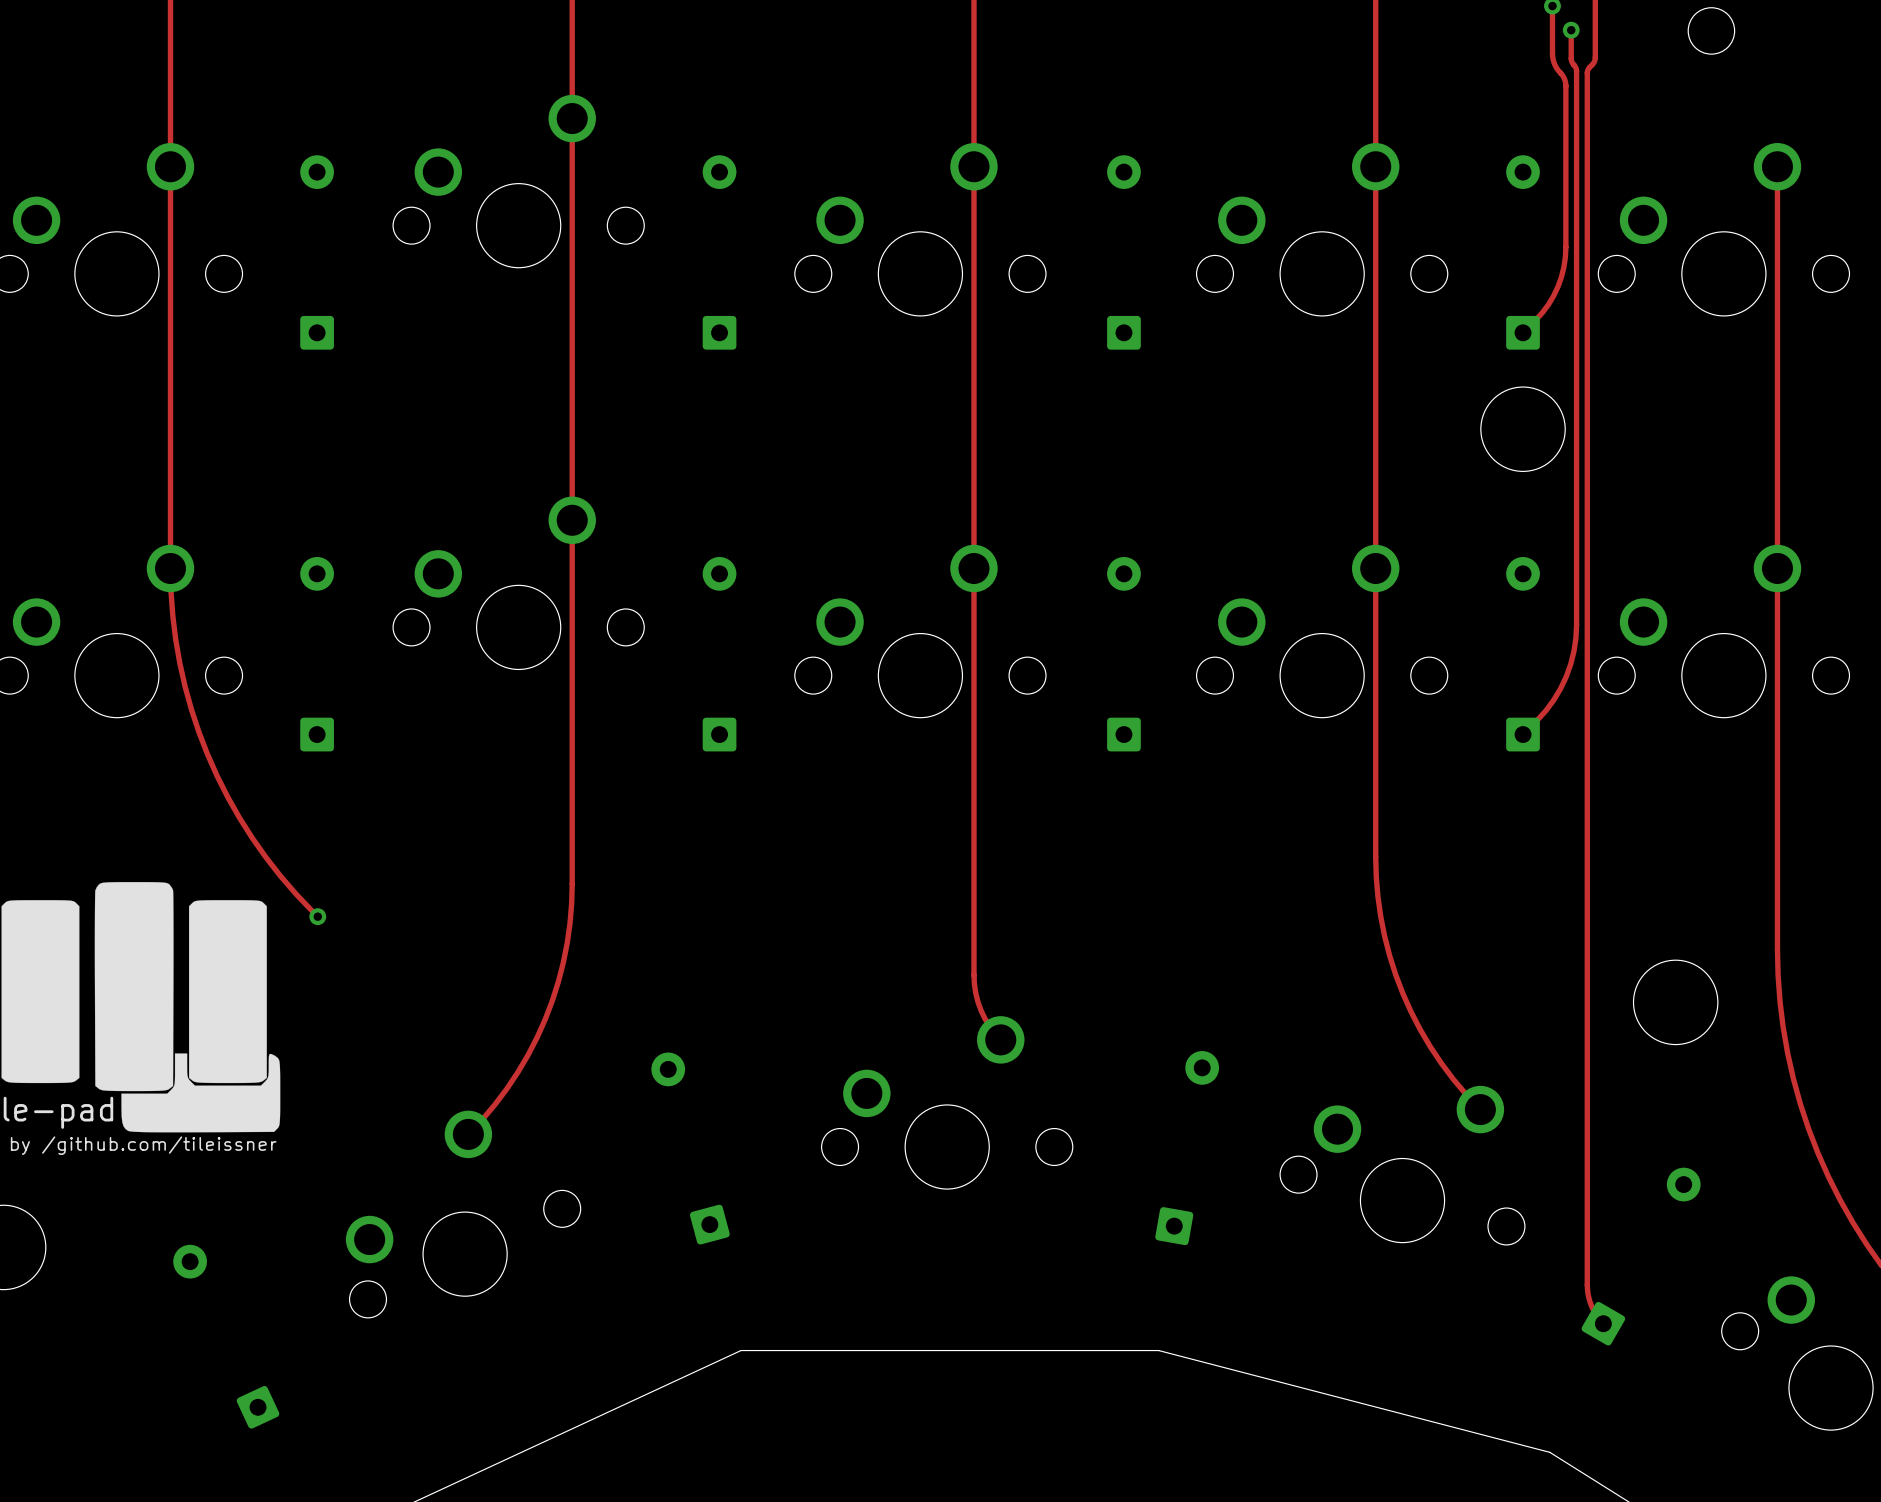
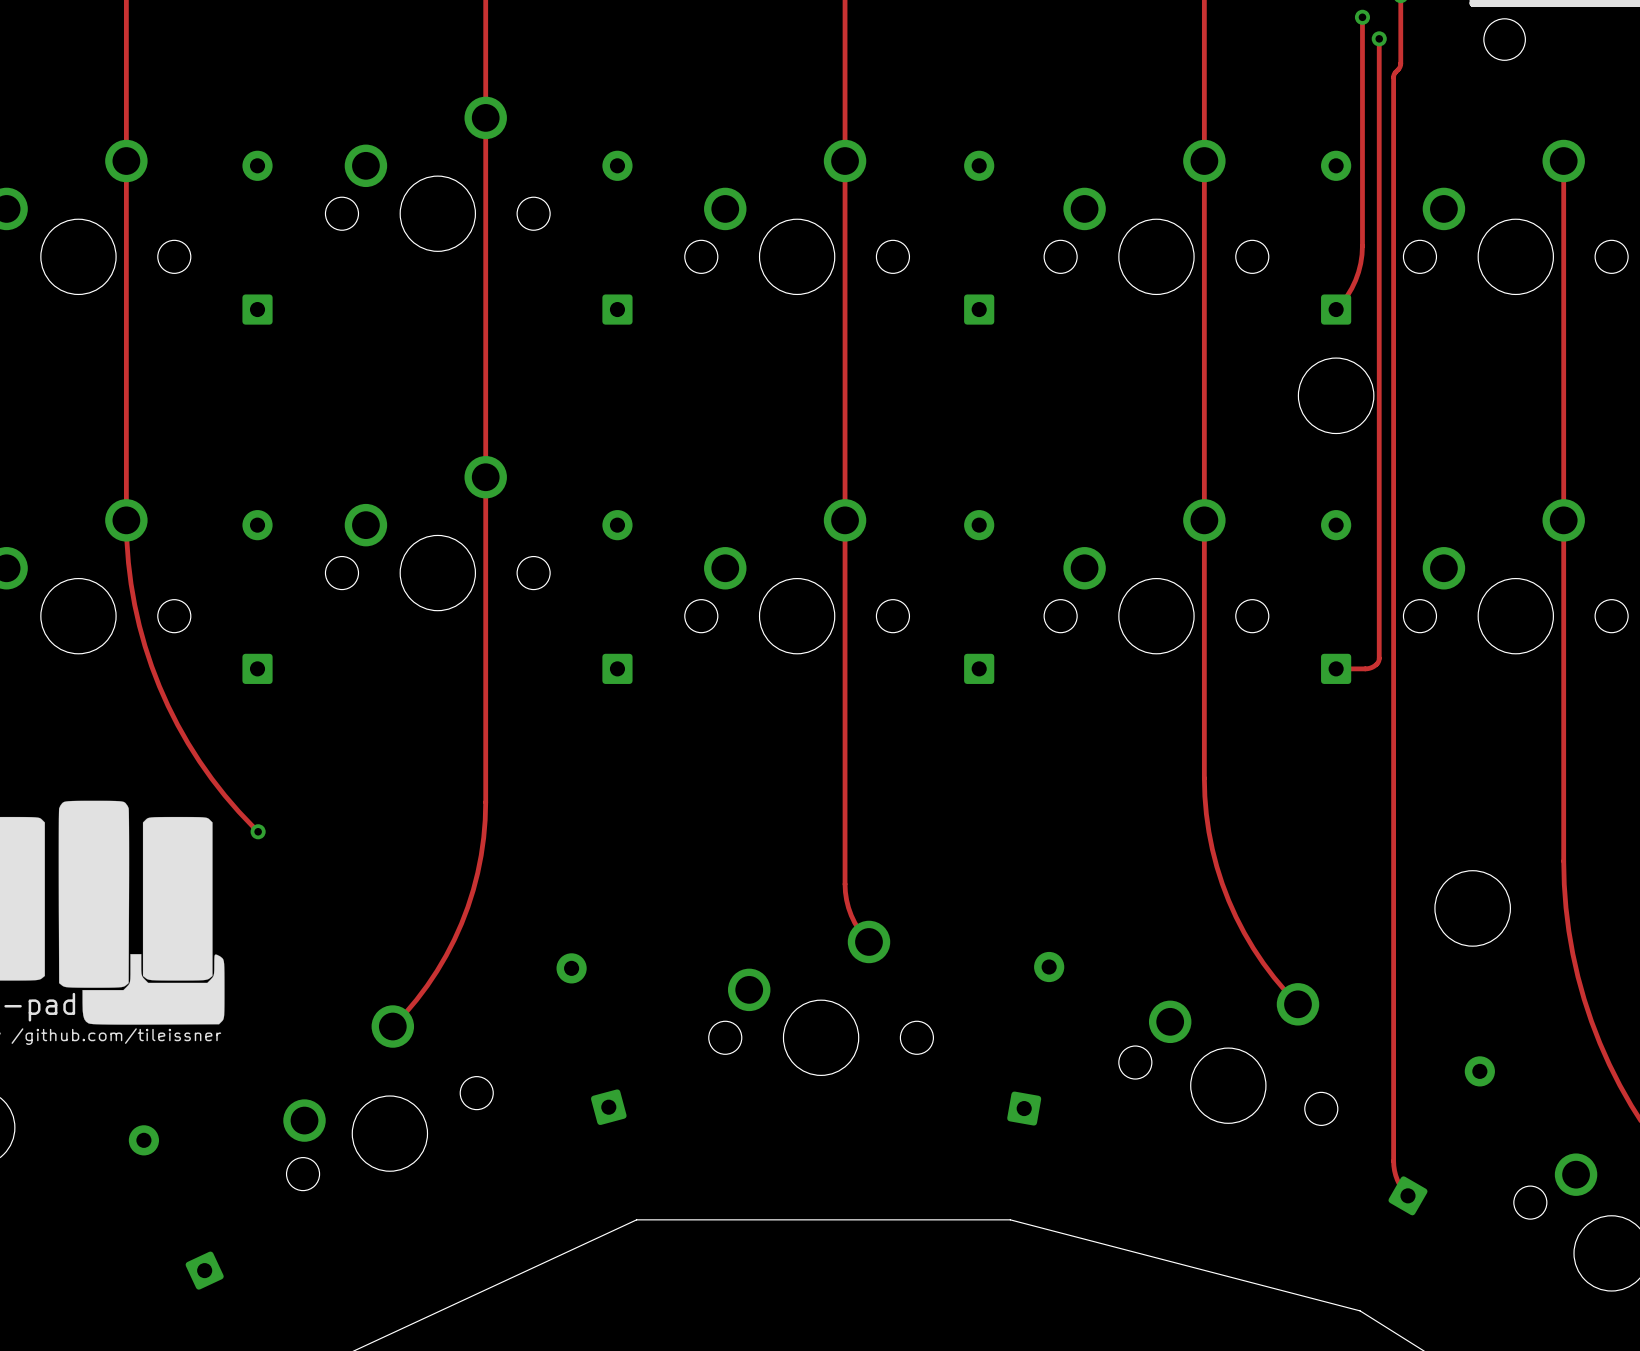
track: (1552, 53) (1554, 64) (1563, 77) (1565, 84) (1565, 257) (1561, 277) (1553, 295) (1535, 320) -> (1362, 59) (1362, 254) (1358, 272) (1351, 288) (1336, 309)
track: (1571, 58) (1576, 71) (1575, 638) (1566, 676) (1553, 700) (1536, 720) -> (1379, 64) (1379, 659) (1375, 665) (1368, 668) (1336, 668)

